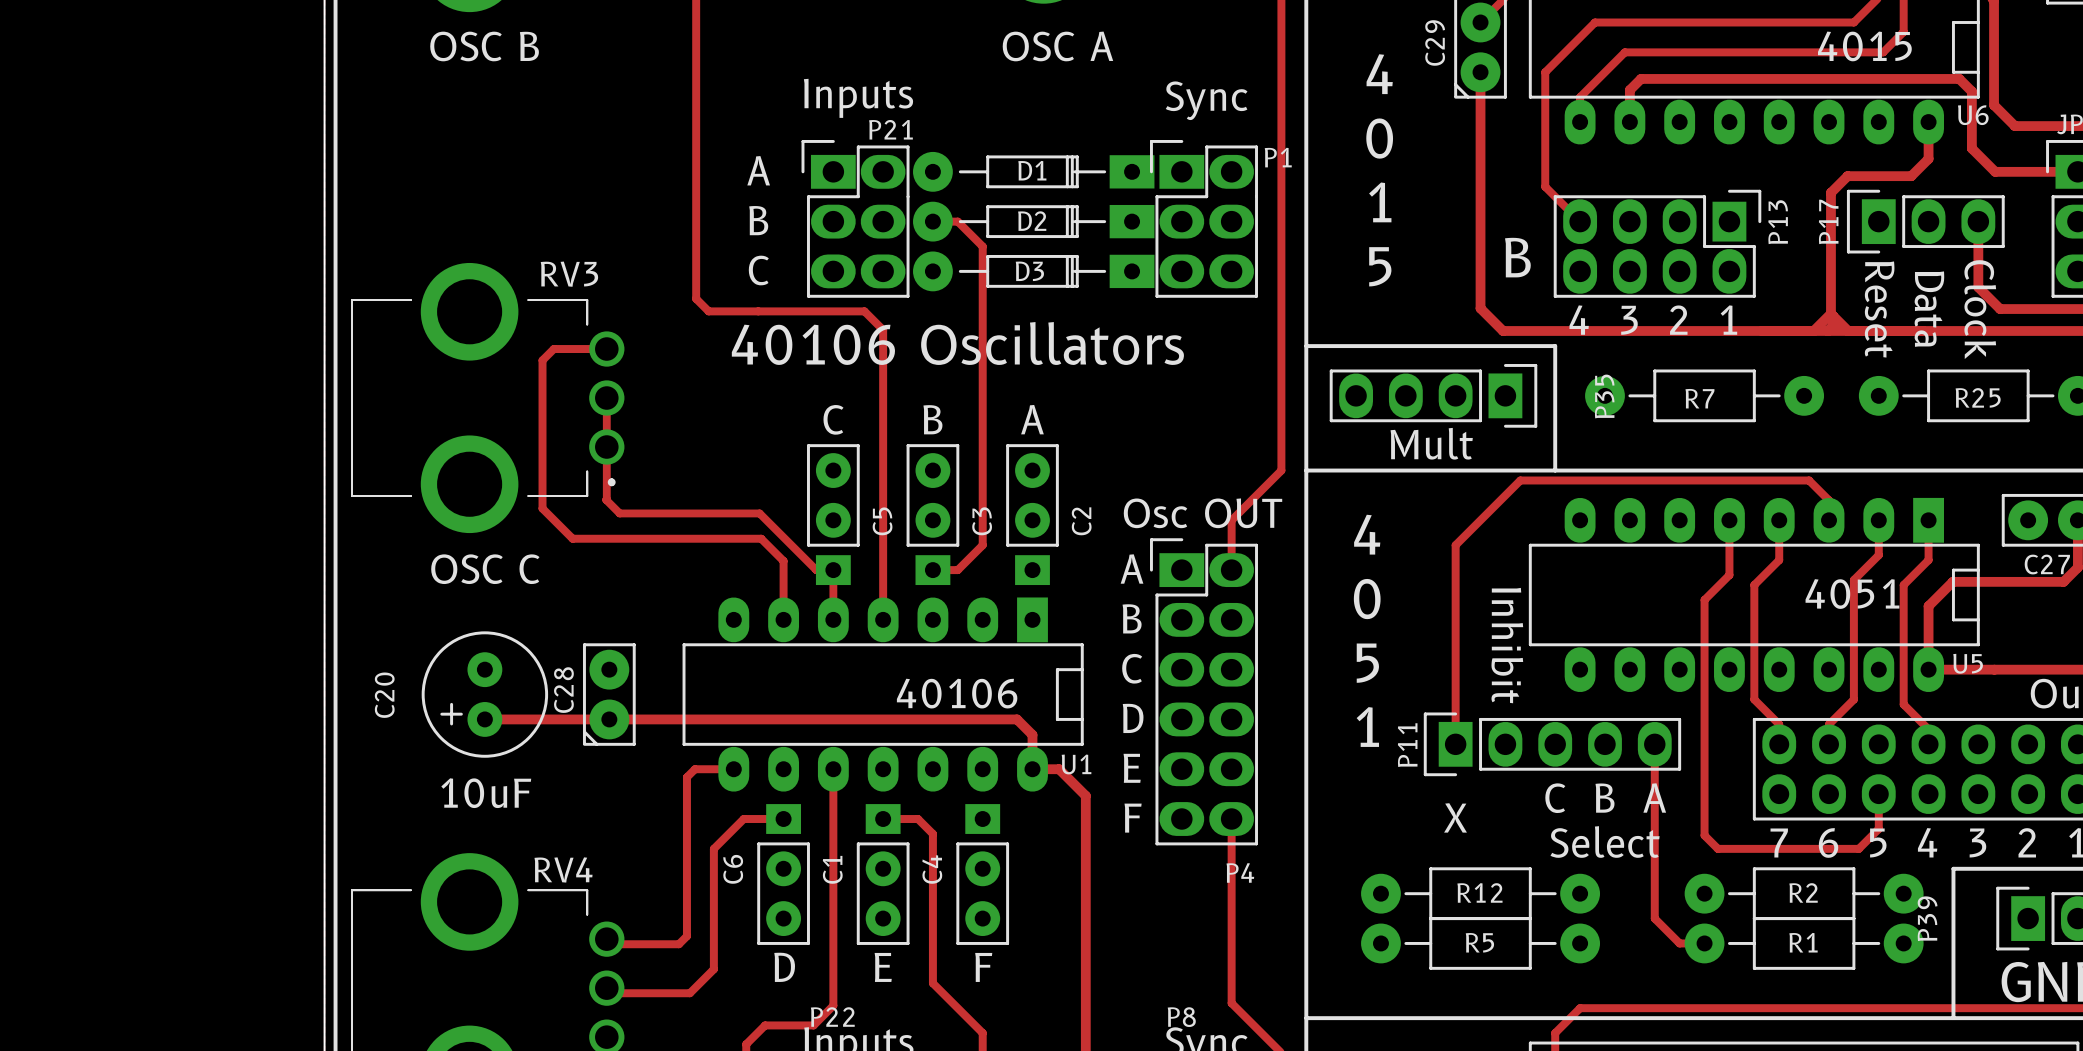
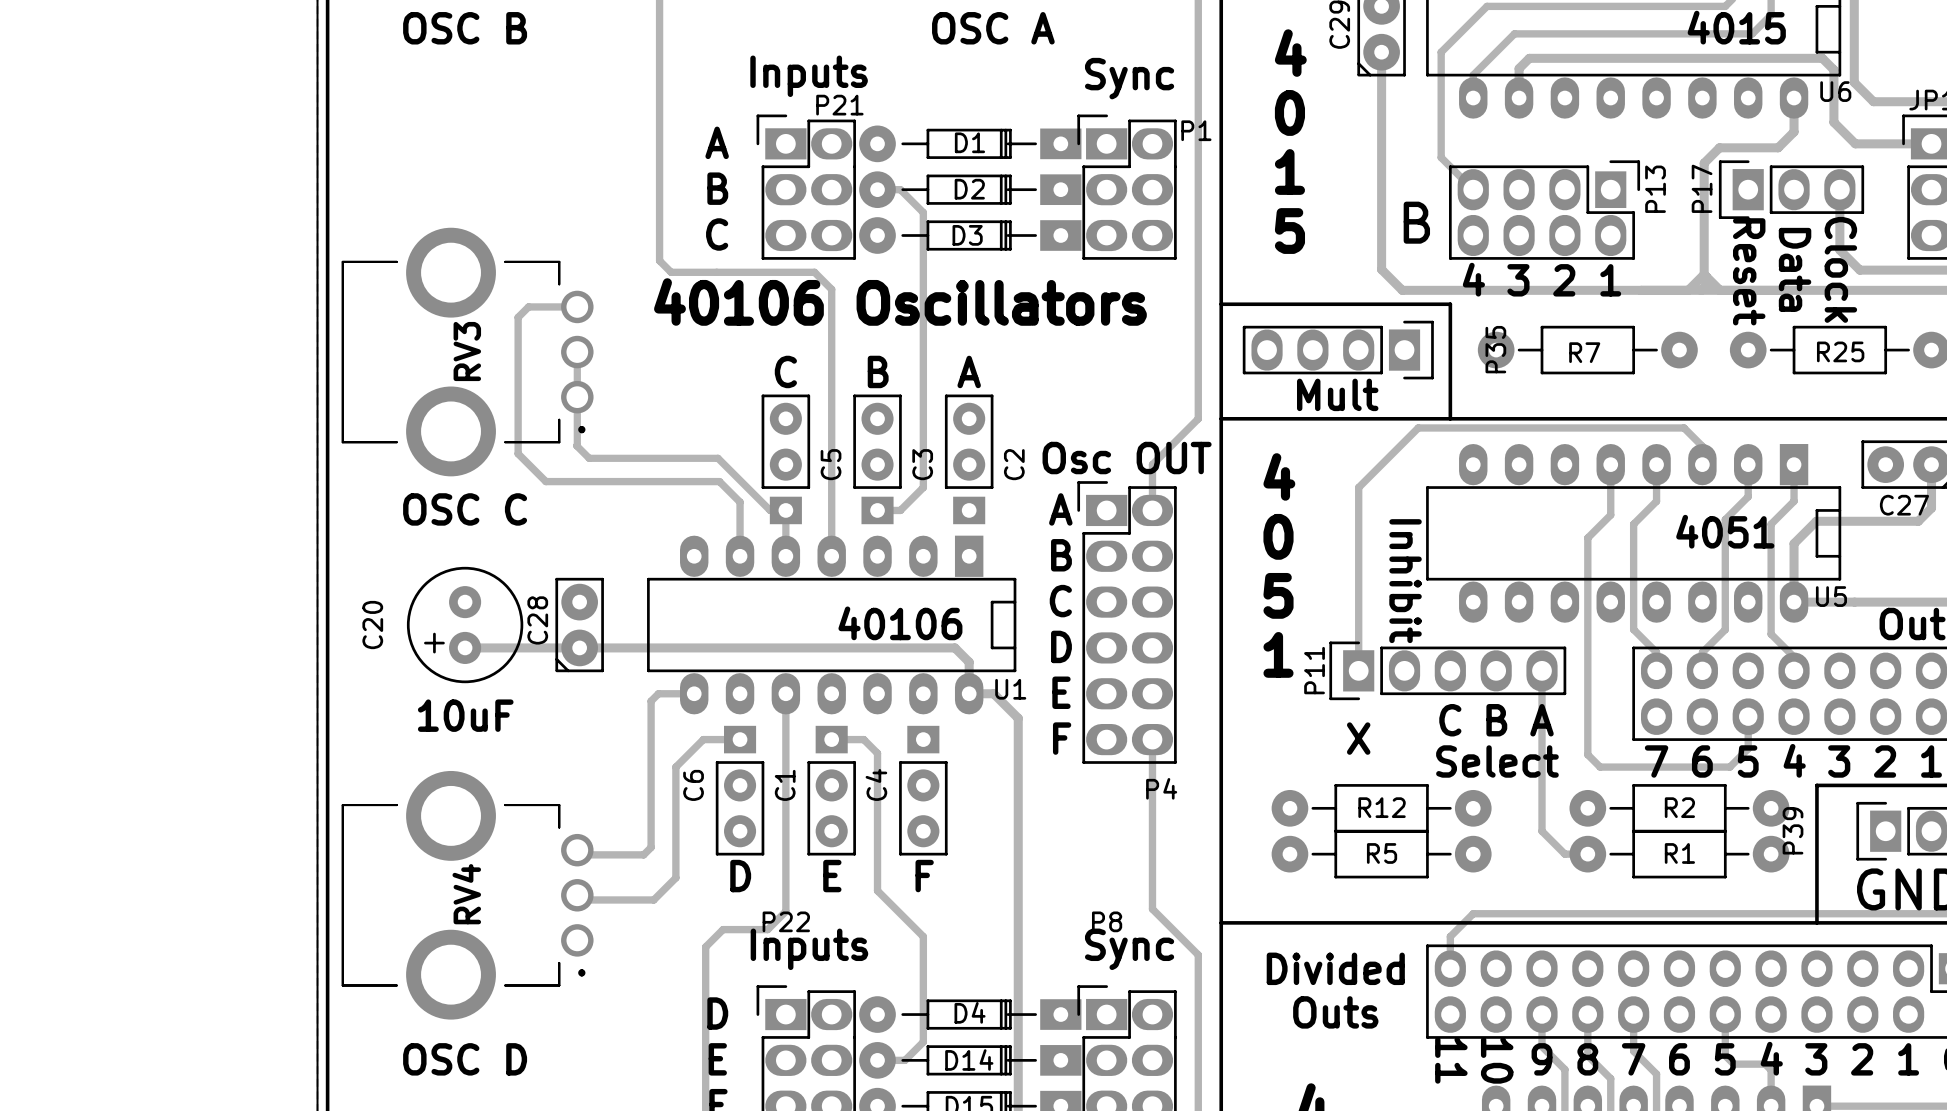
RV3 name rotation: 0° (569, 274) -> 90° counterclockwise (467, 351)
RV3 name position: RV3 (569, 274) -> RV3 (467, 351)
RV4 name rotation: 0° (563, 869) -> 90° counterclockwise (466, 894)
RV4 name position: RV4 (563, 869) -> RV4 (466, 894)

